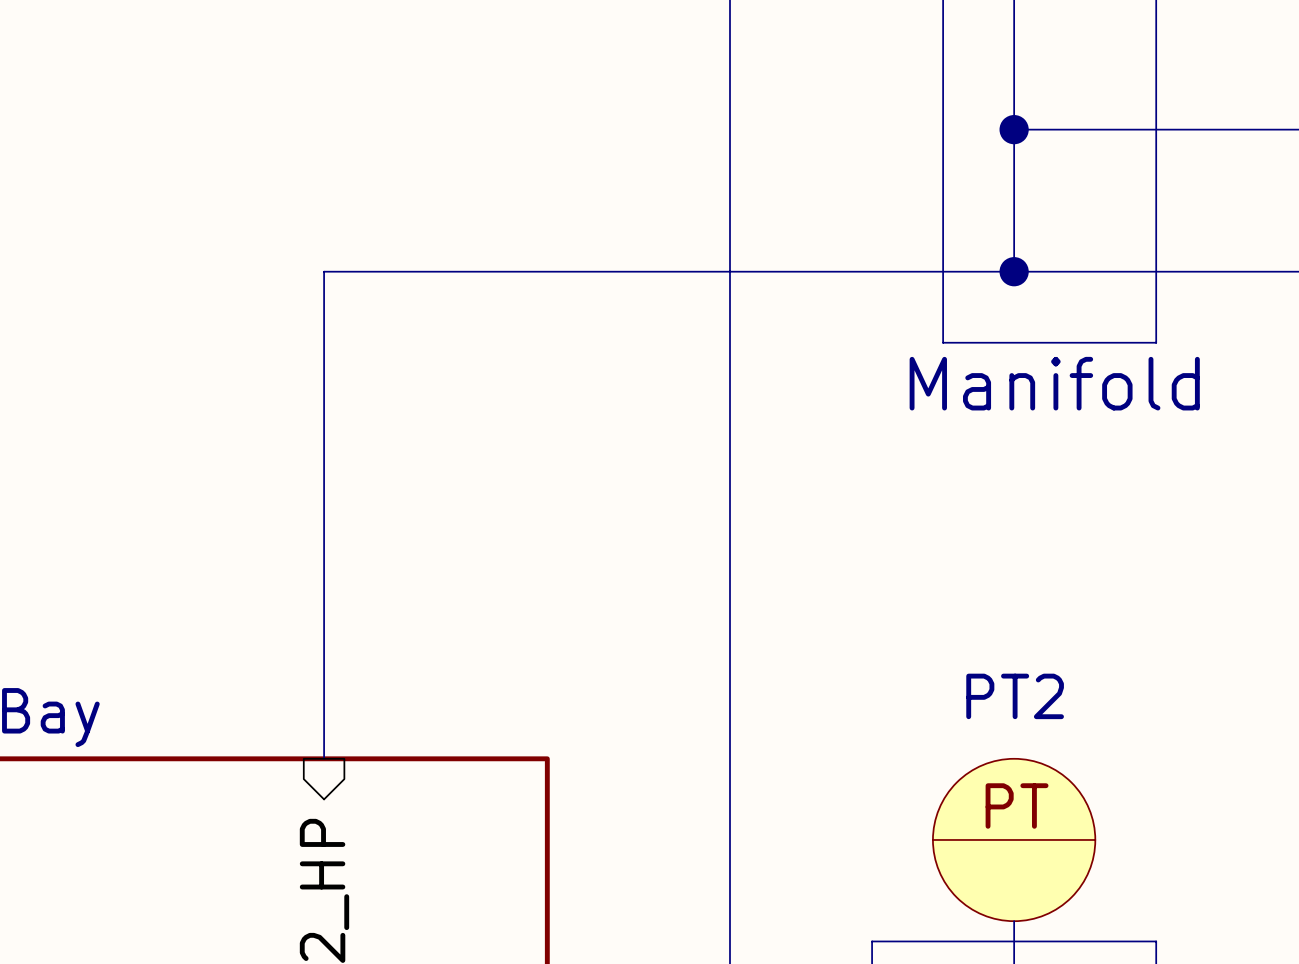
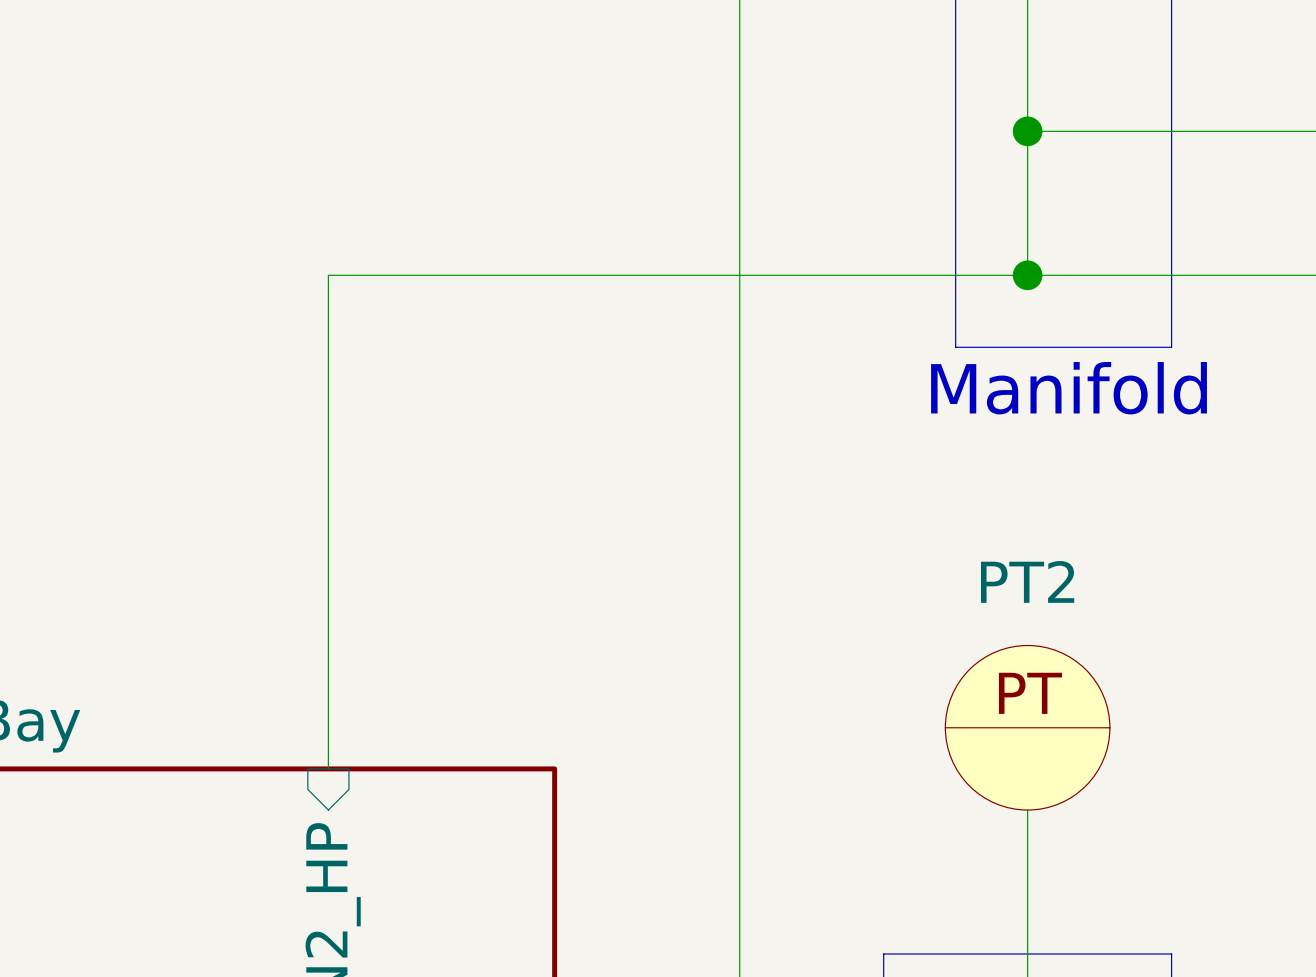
PT2 position: (1014, 839) -> (1027, 727)

